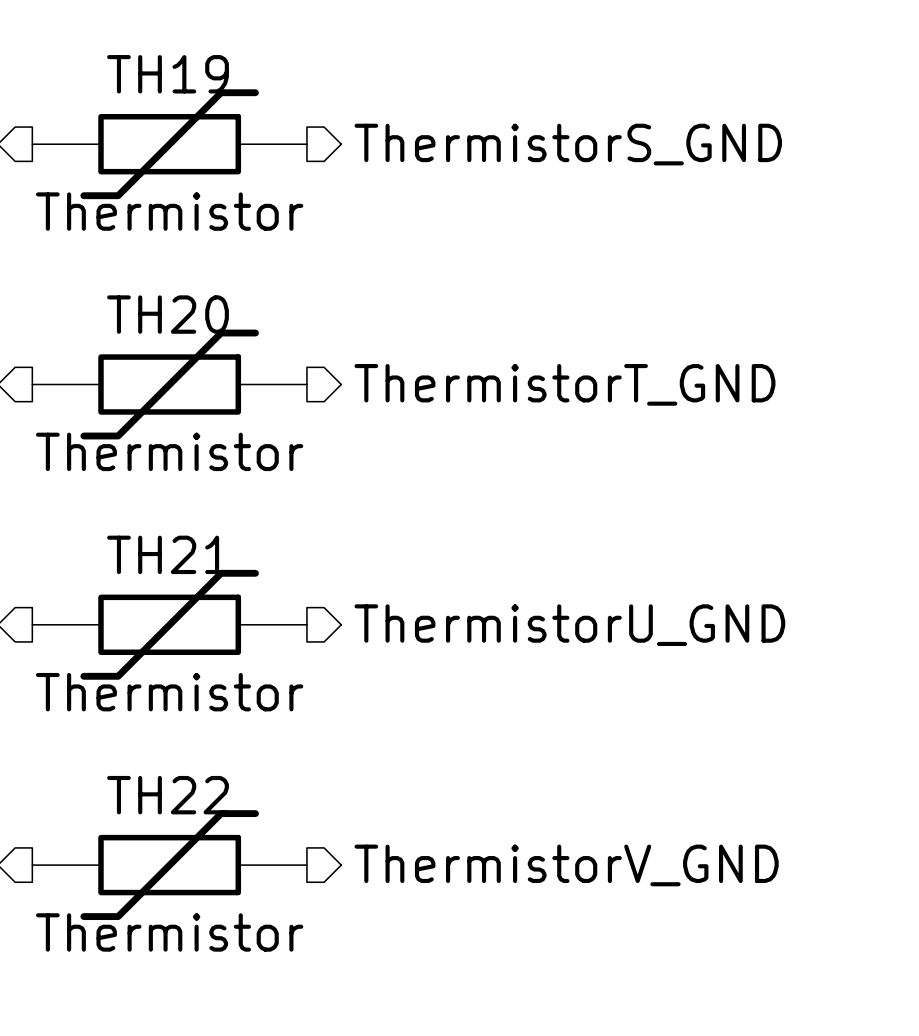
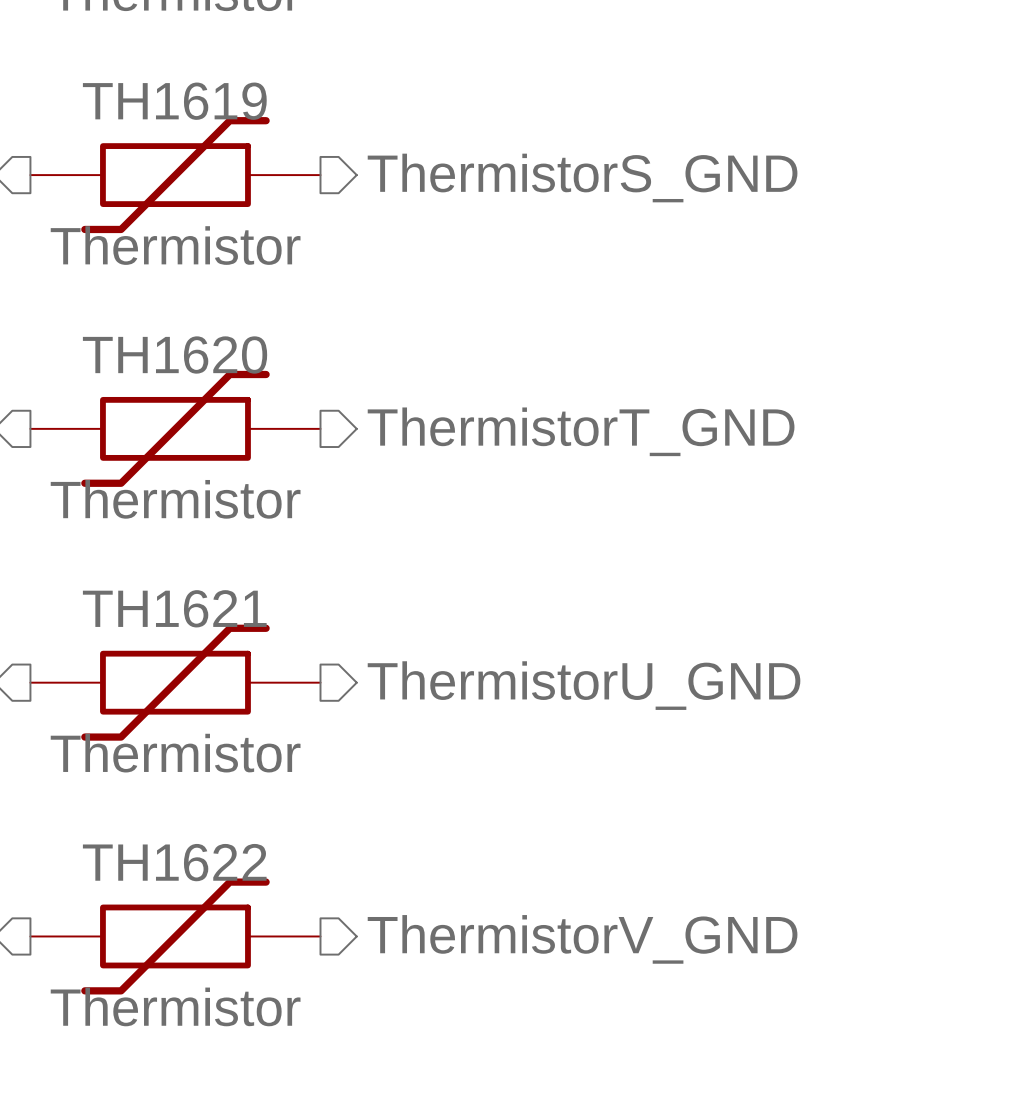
TH19 name: TH19 (168, 74) -> TH1619 (174, 101)
TH20 name: TH20 (168, 314) -> TH1620 (175, 355)
TH21 name: TH21 (168, 554) -> TH1621 (174, 608)
TH22 name: TH22 (168, 795) -> TH1622 (174, 862)

